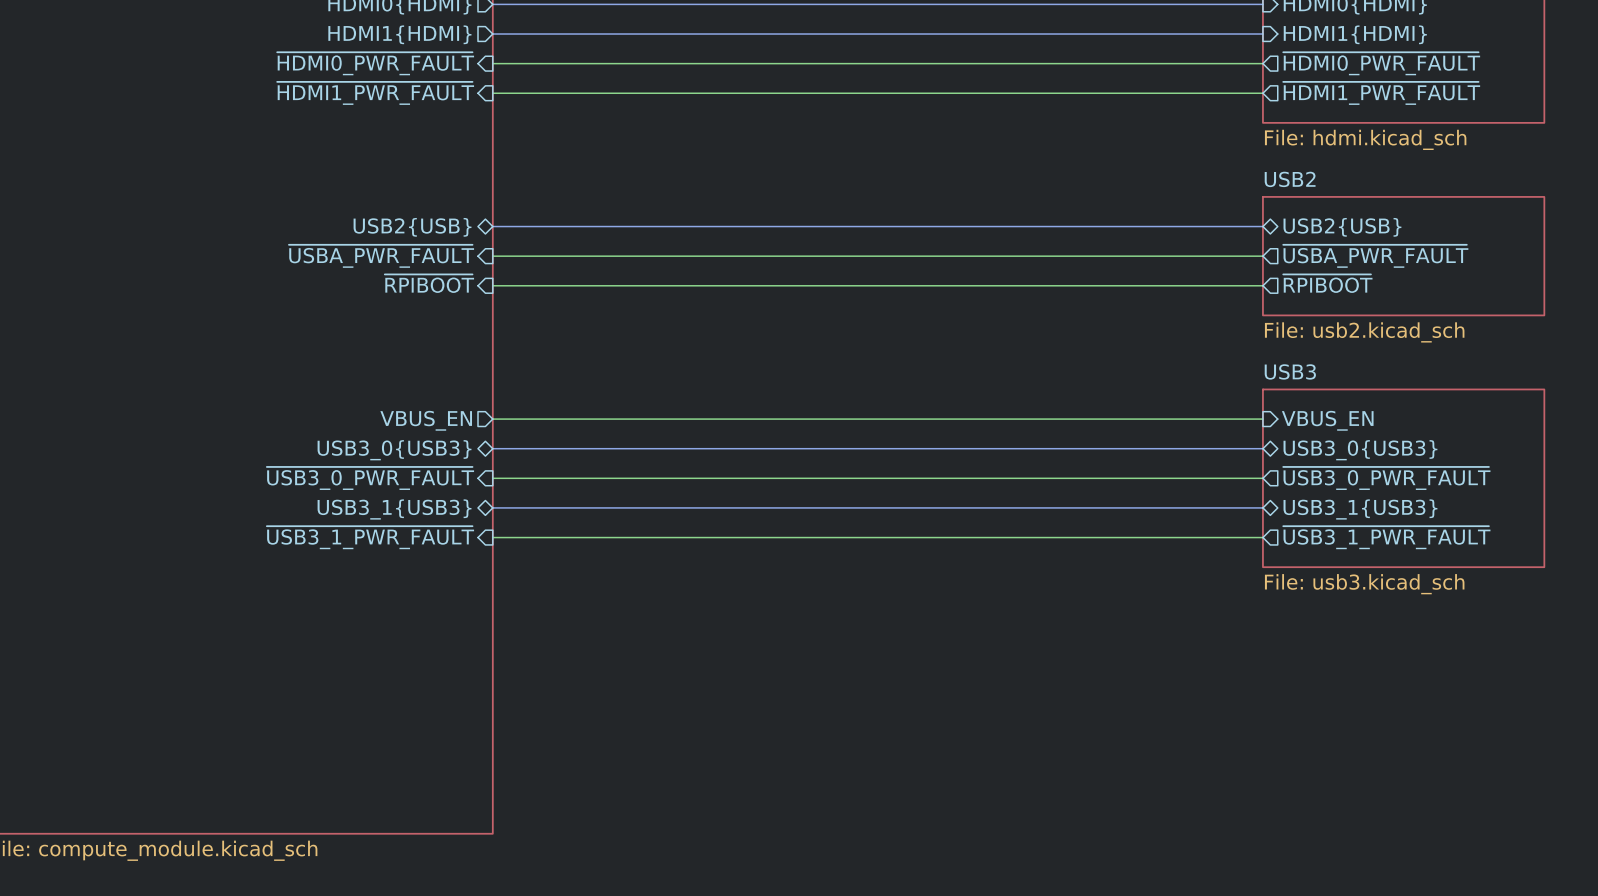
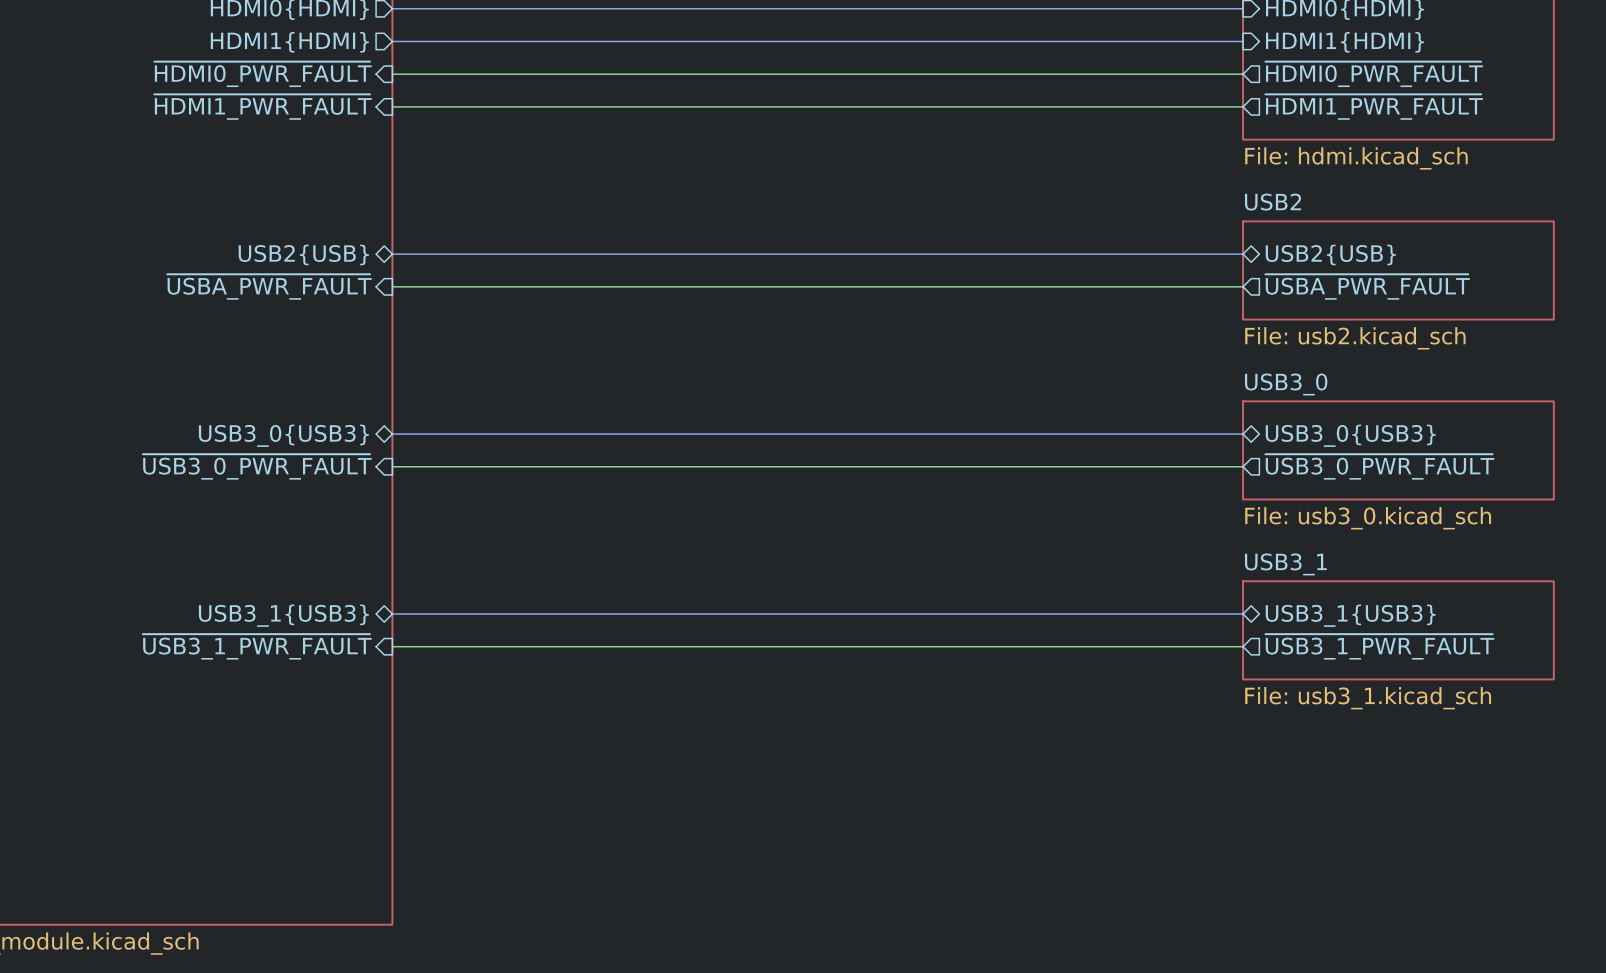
sheet USB2 shape: [1262, 196, 1546, 317] -> [1242, 220, 1555, 321]
sheet pin: ~{RPIBOOT} (429, 283) -> none
sheet pin: ~{RPIBOOT} (1327, 283) -> none
wire: (492, 285) (1262, 285) -> none
sheet USB3_0: none -> File: usb3_0.kicad_sch (1398, 450)
sheet pin shape: output (426, 420) -> input (257, 466)
sheet pin: VBUS_EN (426, 420) -> ~{USB3_0_PWR_FAULT} (257, 466)
sheet pin shape: input (1327, 420) -> output (1379, 466)
sheet pin: VBUS_EN (1327, 420) -> ~{USB3_0_PWR_FAULT} (1379, 466)
bus: (492, 448) (1262, 448) -> (392, 434) (1243, 434)
sheet pin position: USB3_0{USB3} (394, 450) -> USB3_0{USB3} (283, 435)
sheet pin position: USB3_0{USB3} (1360, 450) -> USB3_0{USB3} (1350, 435)
sheet pin: ~{USB3_0_PWR_FAULT} (370, 478) -> none
wire: (492, 478) (1262, 478) -> none
sheet pin: ~{USB3_0_PWR_FAULT} (1386, 478) -> none
sheet USB3: File: usb3.kicad_sch (1403, 478) -> none
bus: (492, 507) (1262, 507) -> (392, 613) (1243, 613)
sheet pin position: USB3_1{USB3} (394, 509) -> USB3_1{USB3} (283, 615)
sheet pin position: USB3_1{USB3} (1360, 509) -> USB3_1{USB3} (1350, 615)
sheet pin position: ~{USB3_1_PWR_FAULT} (370, 537) -> ~{USB3_1_PWR_FAULT} (257, 646)
wire: (492, 537) (1262, 537) -> (392, 646) (1243, 646)
sheet pin position: ~{USB3_1_PWR_FAULT} (1386, 537) -> ~{USB3_1_PWR_FAULT} (1379, 646)
sheet USB3_1: none -> File: usb3_1.kicad_sch (1398, 630)

